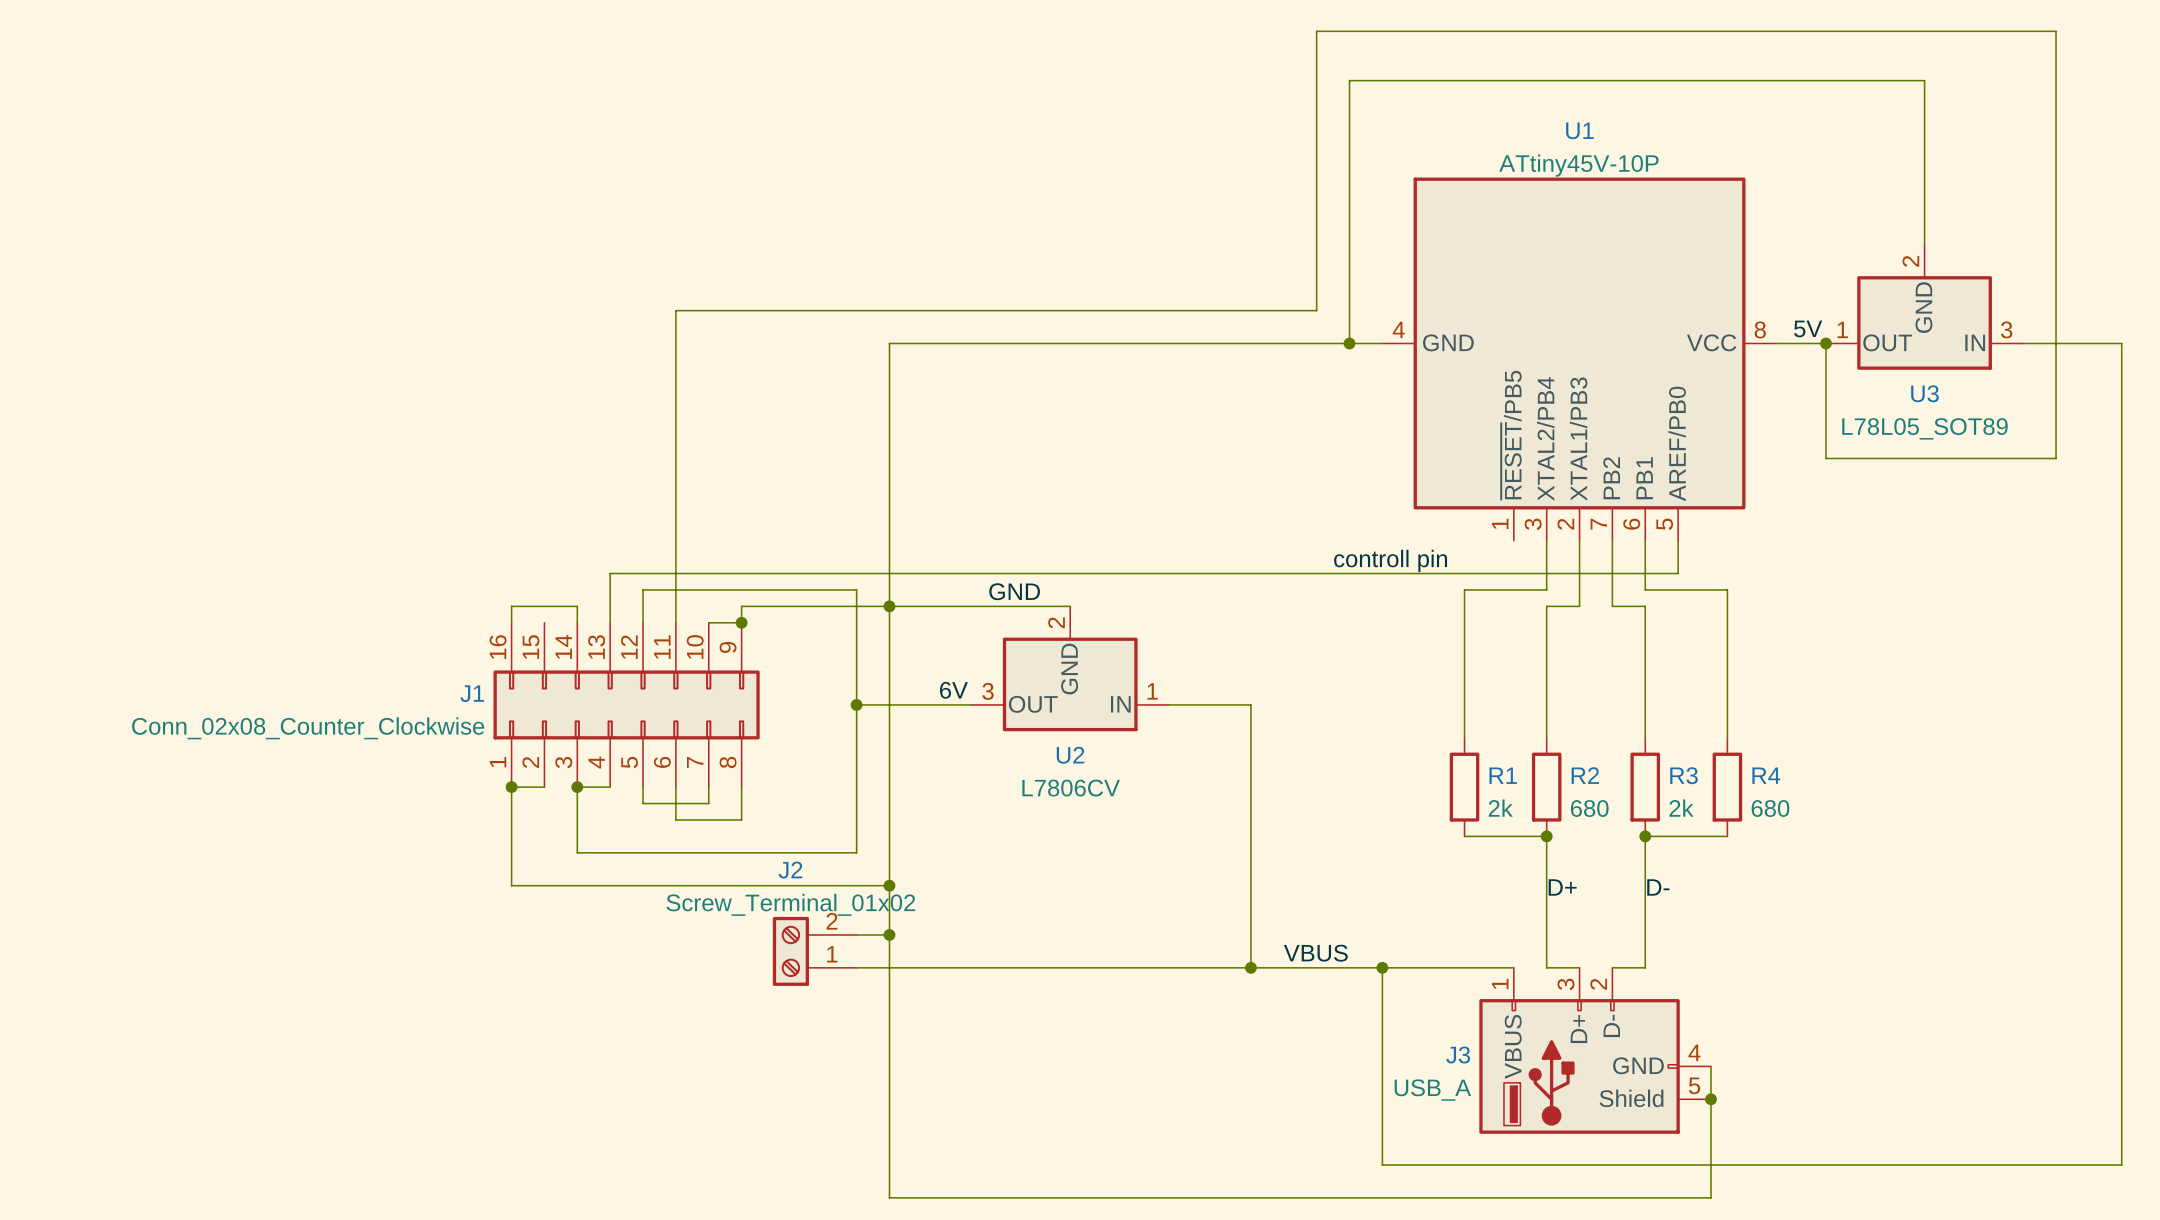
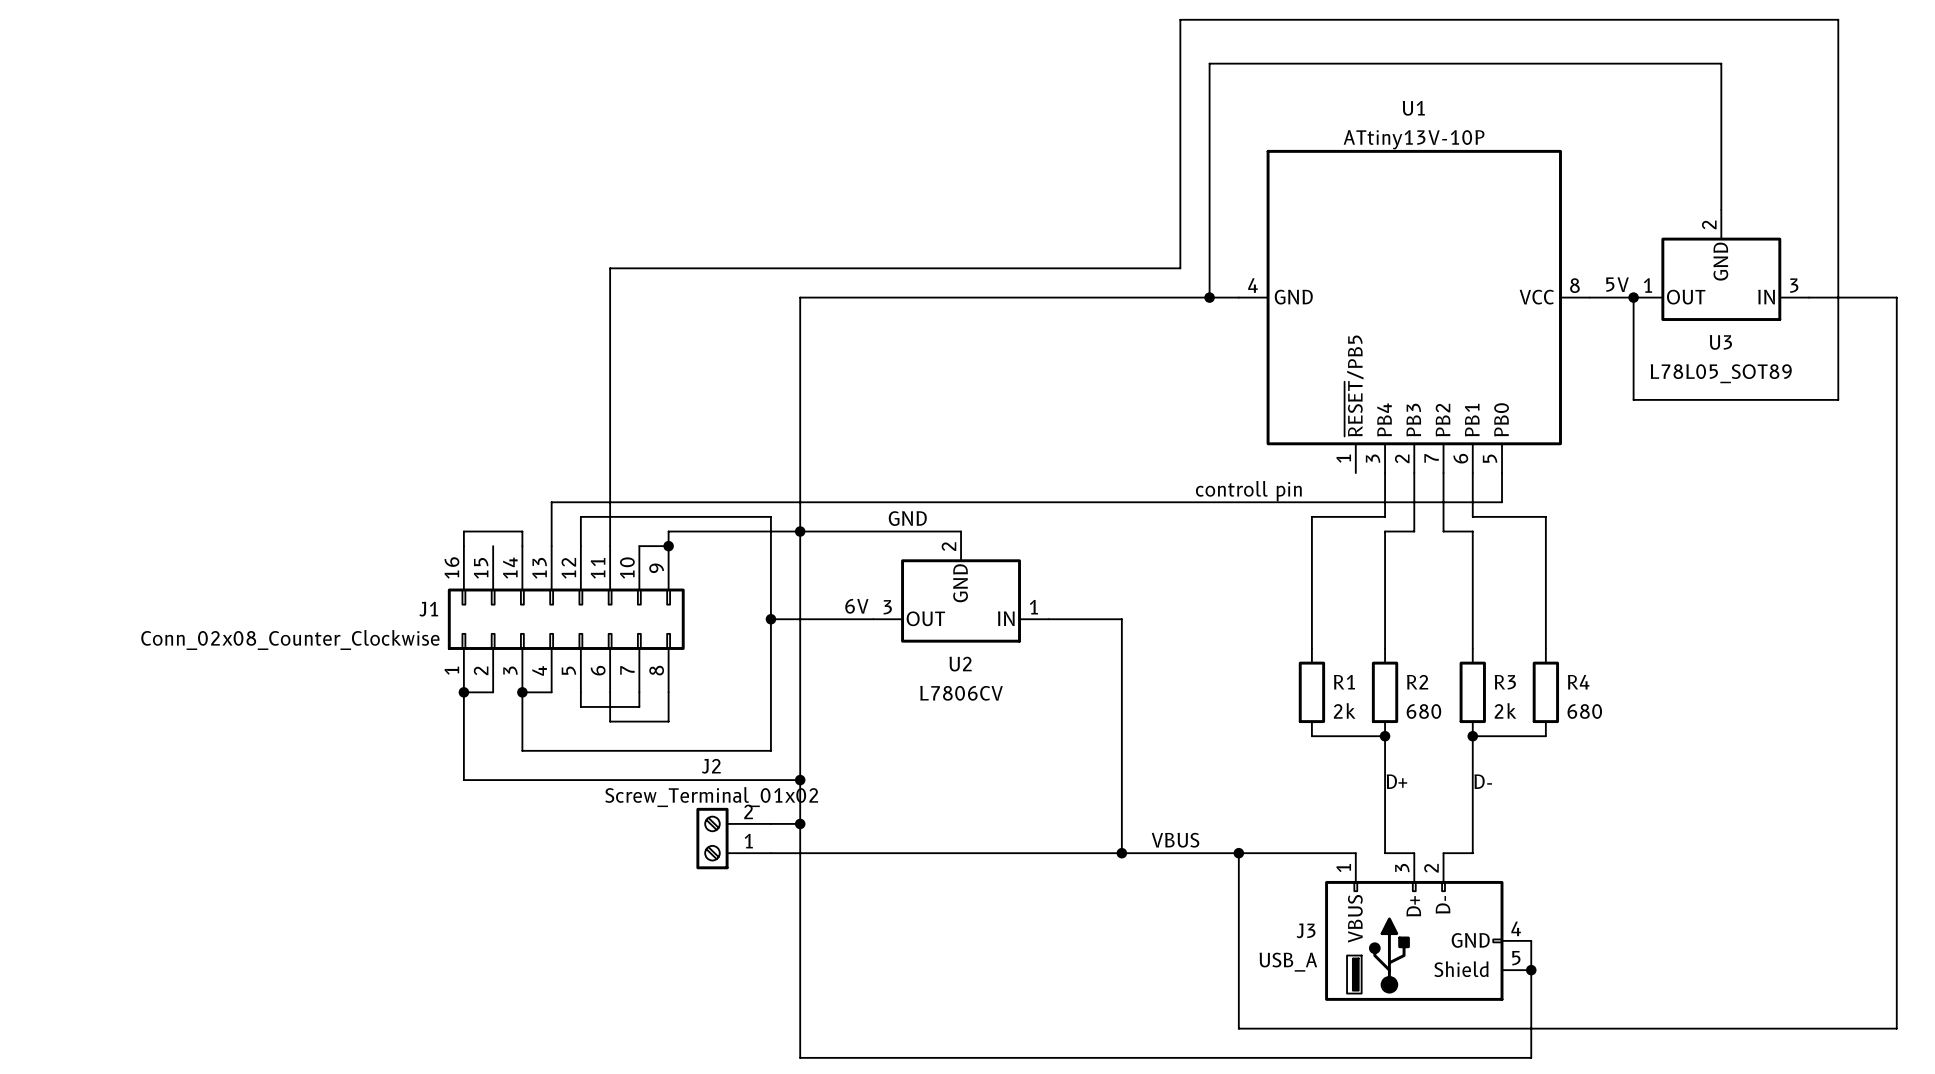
U1 value: ATtiny45V-10P (1578, 165) -> ATtiny13V-10P (1414, 139)
U1 pin name: XTAL2/PB4 (1545, 438) -> PB4 (1384, 419)
U1 pin name: XTAL1/PB3 (1578, 439) -> PB3 (1413, 420)
U1 pin name: AREF/PB0 (1677, 443) -> PB0 (1501, 419)

